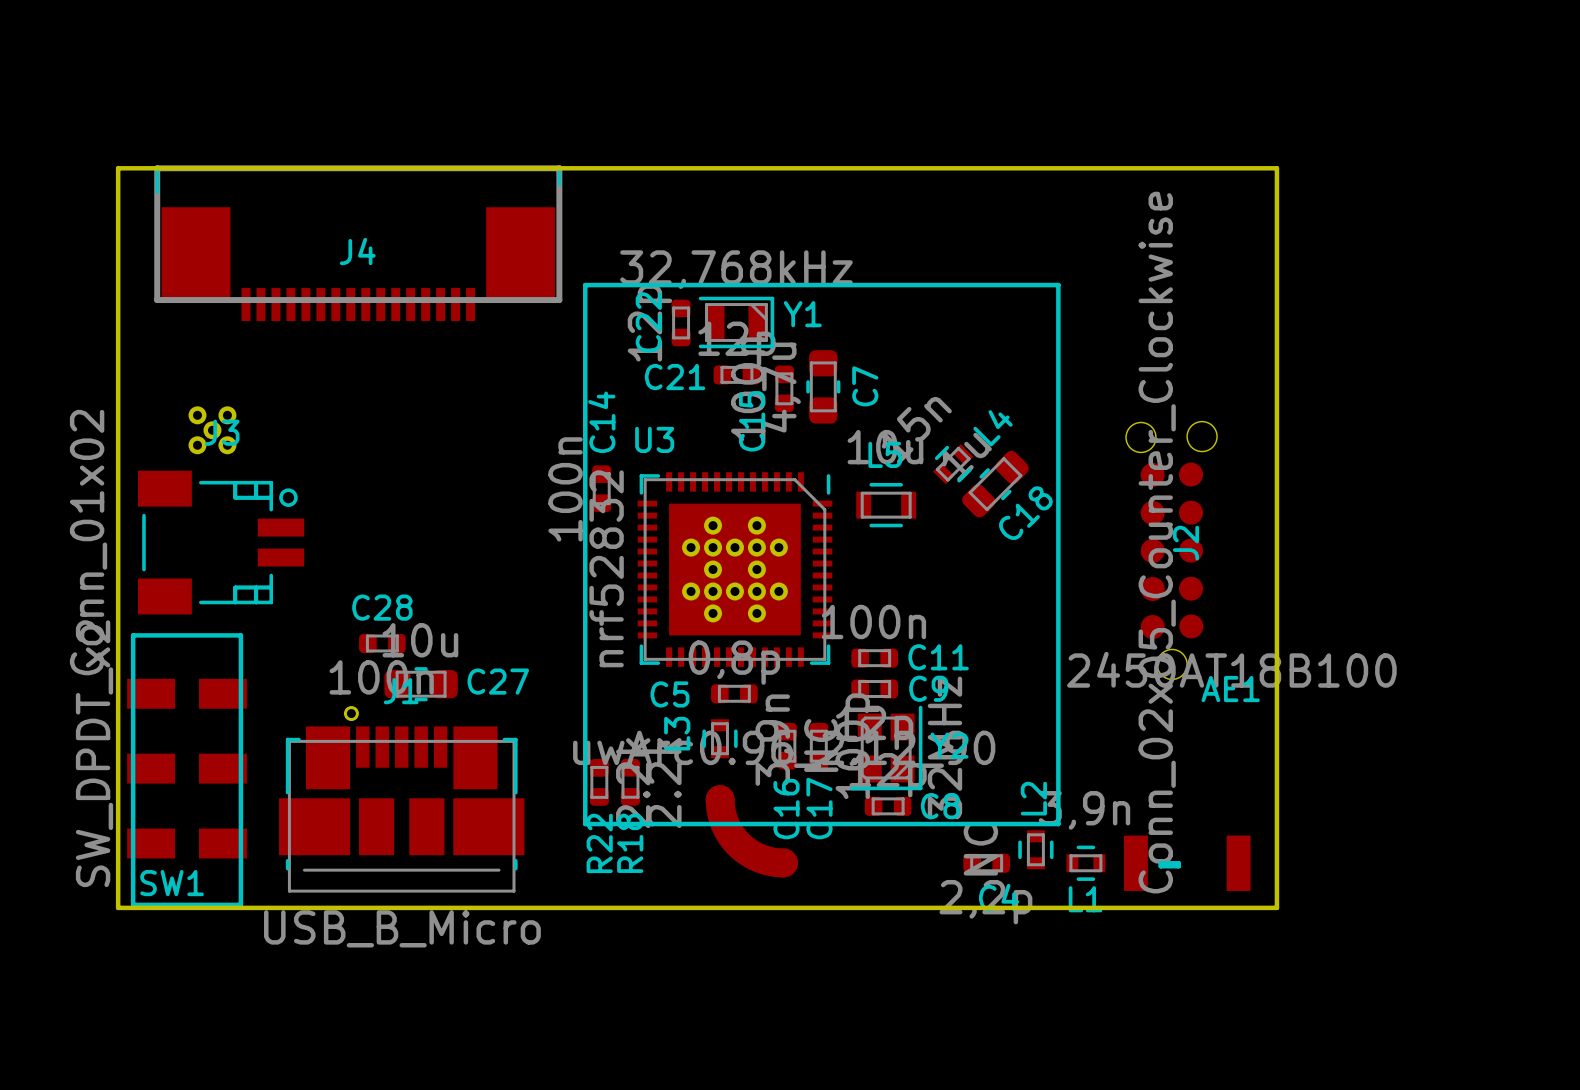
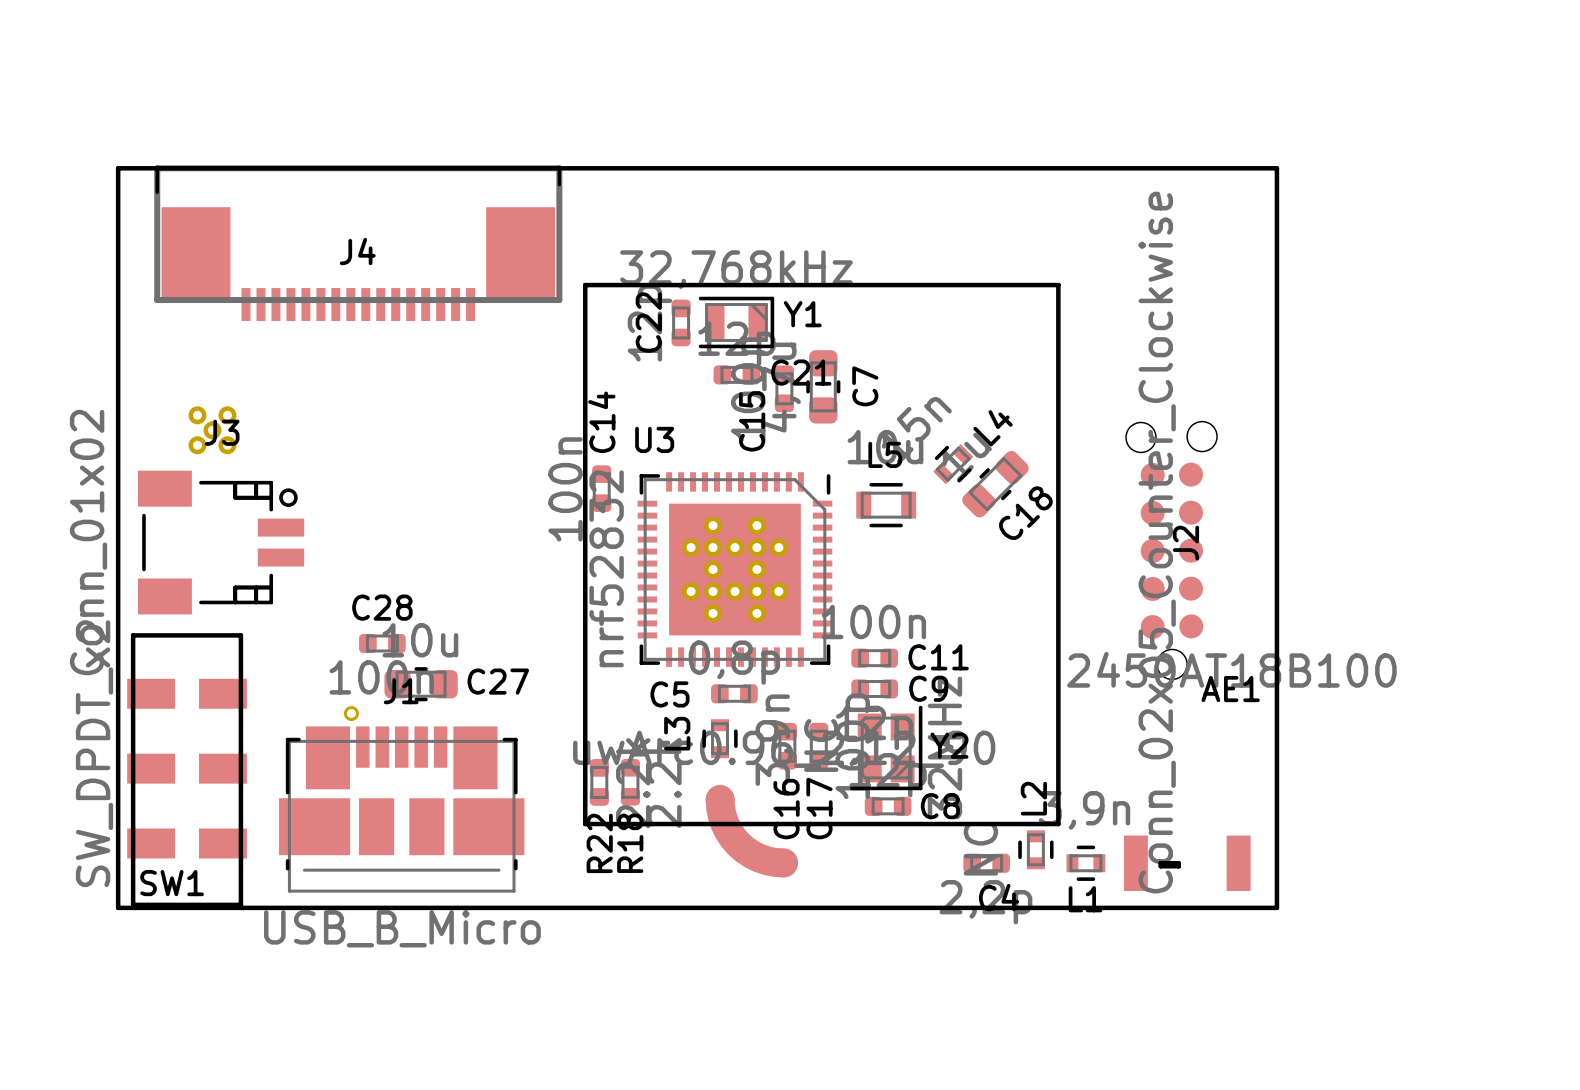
C21 name position: C21 (675, 377) -> C21 (801, 372)

